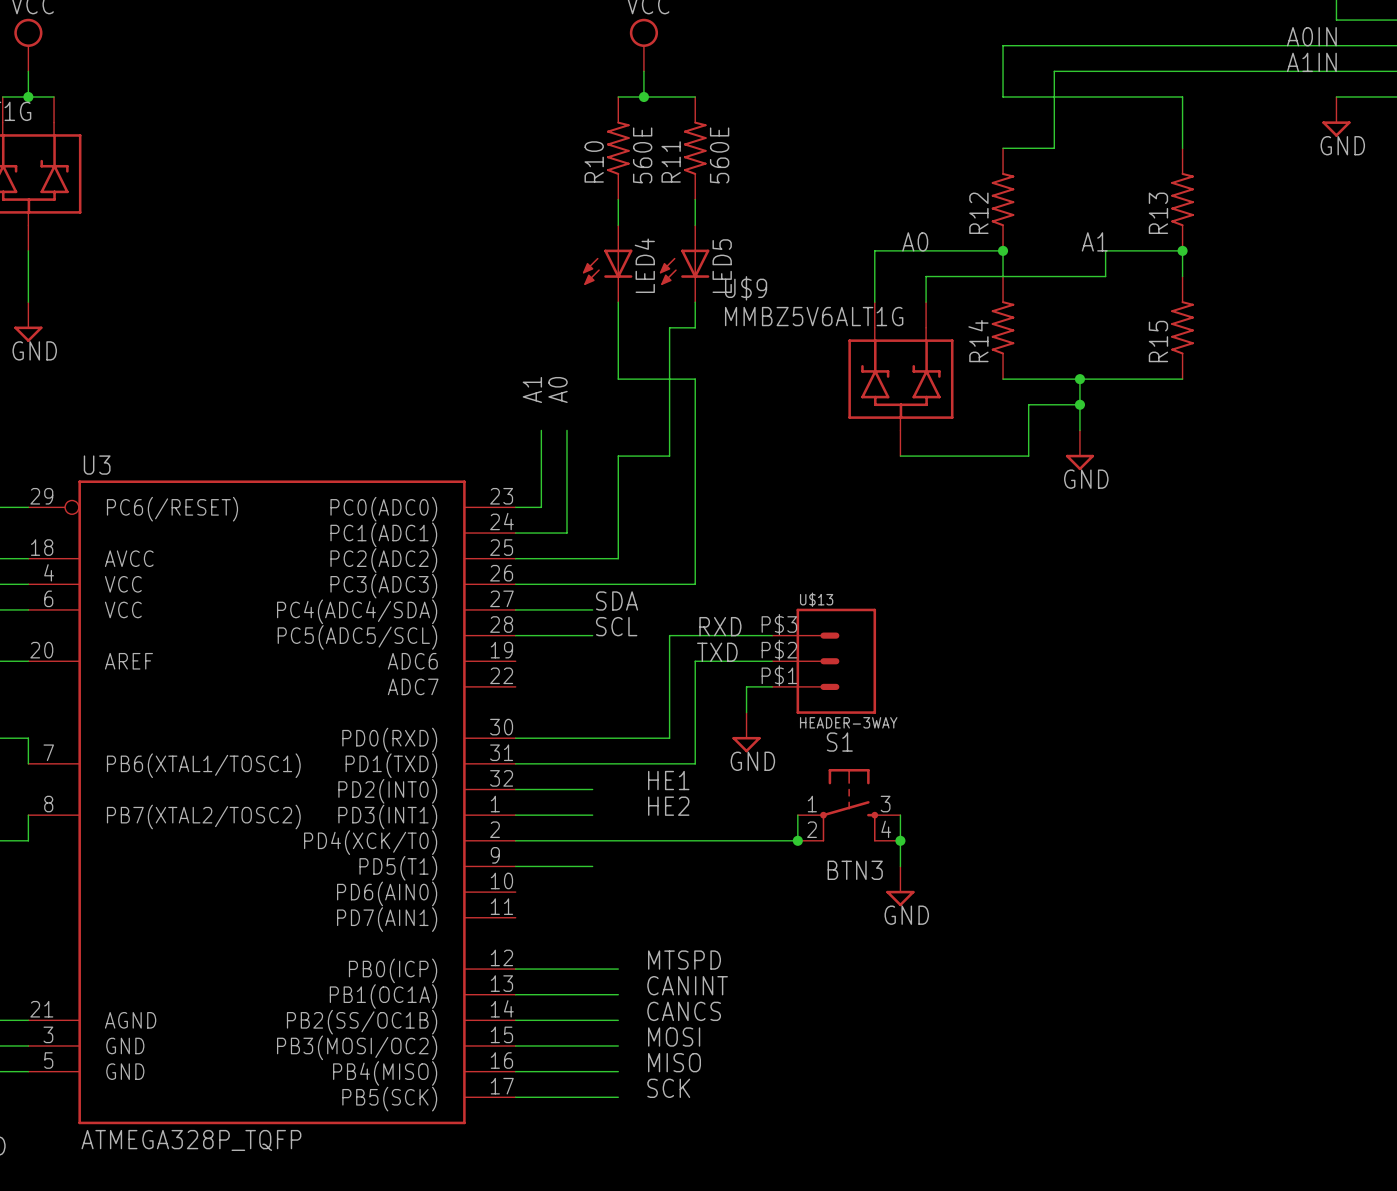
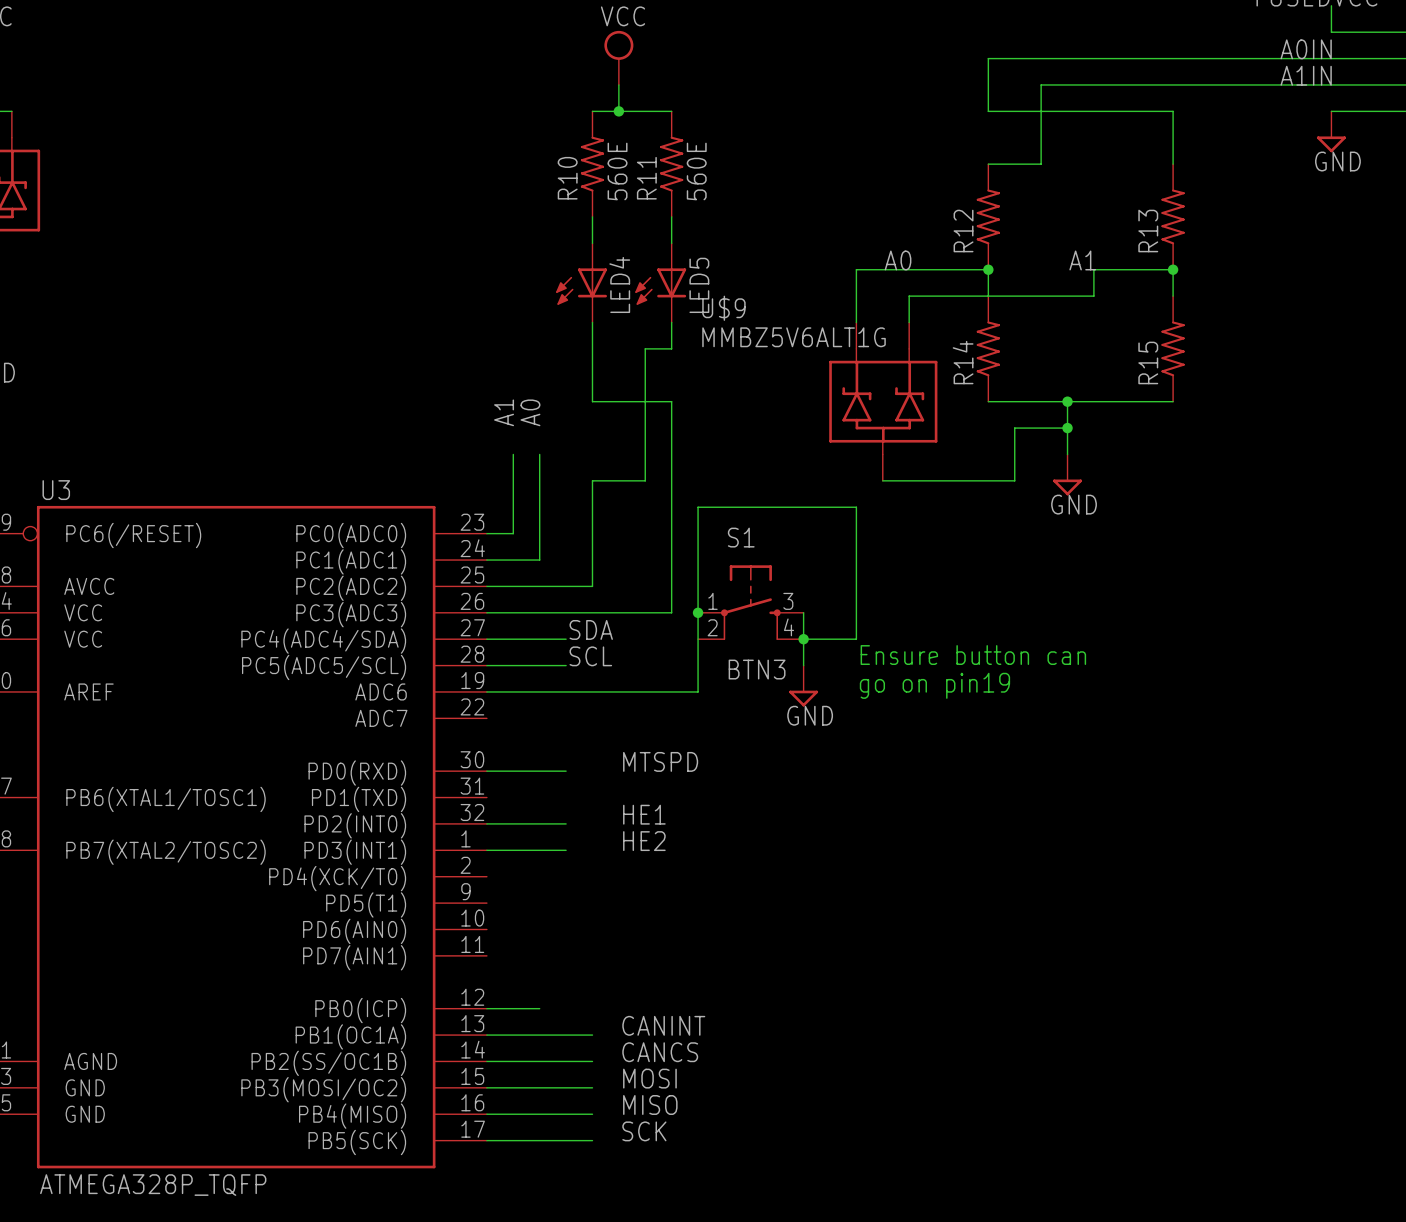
junction: none -> (698, 612)
junction: none -> (803, 639)
text: none -> Ensure button can (973, 655)
label: RXD (720, 626) -> none
wire: (772, 635) (669, 635) (669, 738) (592, 738) -> none
label: TXD (717, 652) -> none
text: none -> go on pin19 (934, 685)
wire: (695, 661) (695, 763) (515, 763) -> (671, 691) (486, 691)
wire: (720, 661) (772, 661) -> (698, 691) (698, 507) (856, 507) (856, 639) (803, 639)
U$13: HEADER-3WAY (824, 661) -> none
wire: (772, 686) (746, 686) (746, 712) -> none
power symbol position: GND (746, 732) -> GND (803, 686)
S1 position: (849, 805) -> (750, 602)
wire: (797, 815) (797, 840) (515, 840) -> none
wire: (900, 815) (900, 866) -> (803, 612) (803, 665)
junction: (797, 840) -> none
junction: (900, 840) -> none
wire: (515, 866) (592, 866) -> none
power symbol: GND (900, 886) -> none
label position: MTSPD (684, 960) -> MTSPD (660, 761)
wire: (566, 969) (618, 969) -> none

